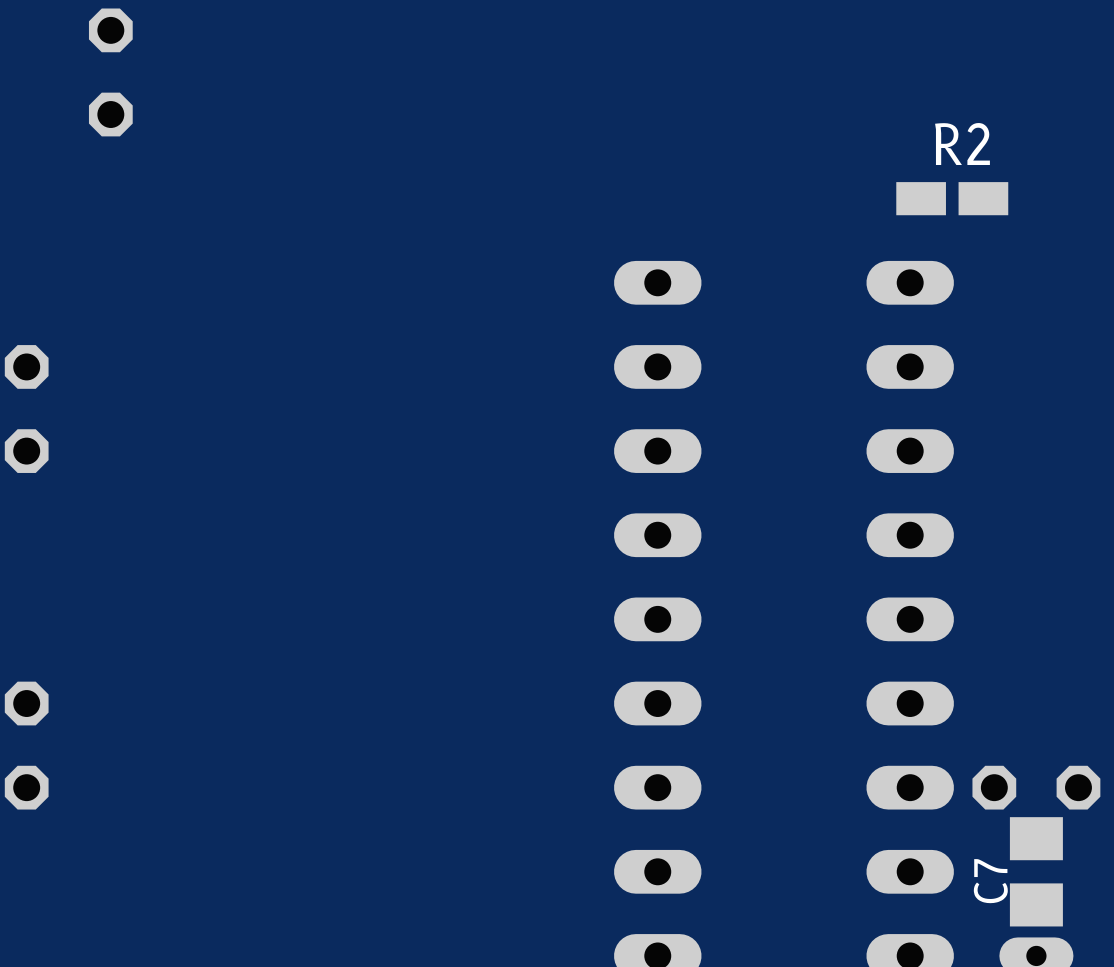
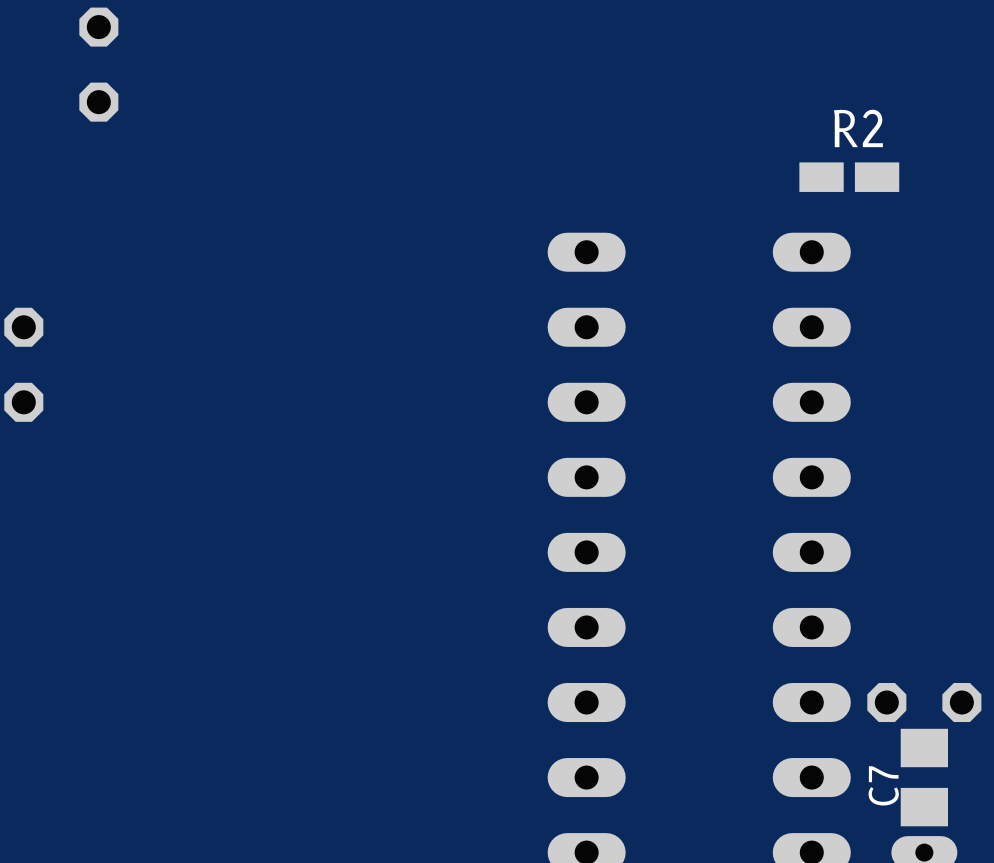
part: (26, 745) -> none

